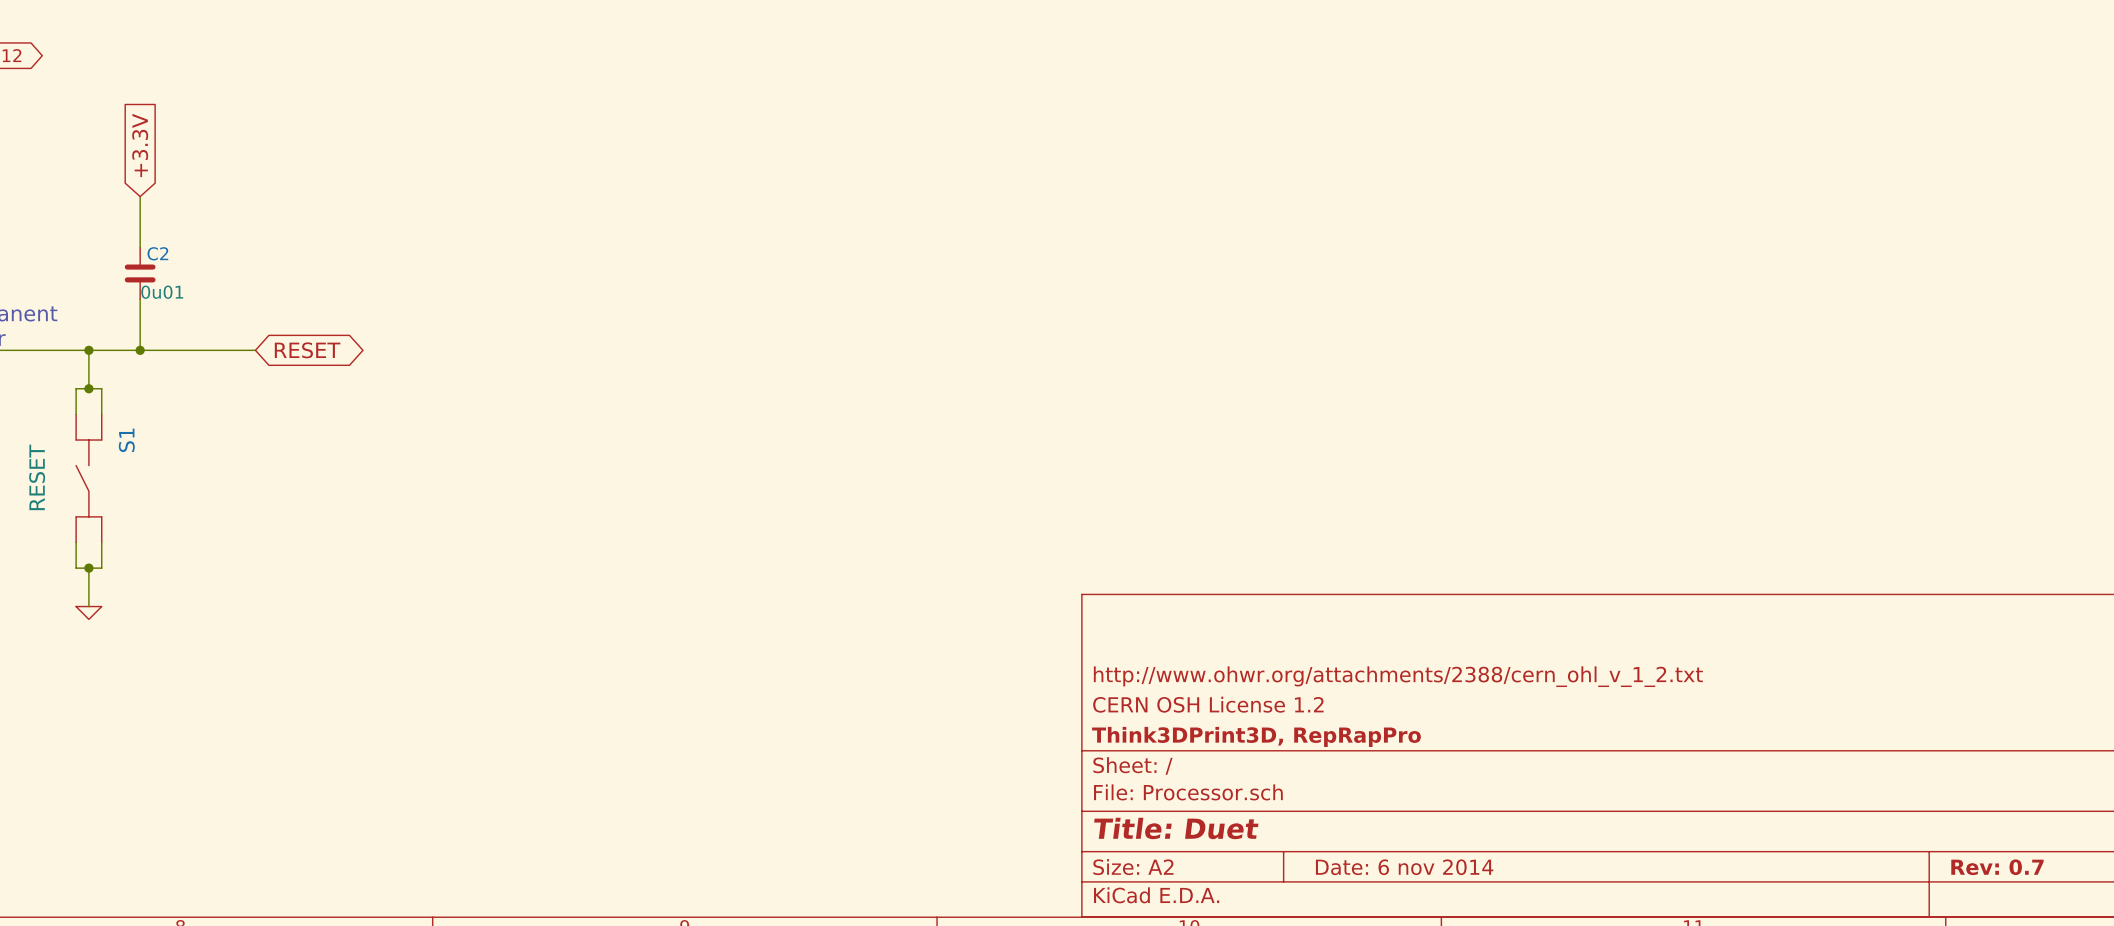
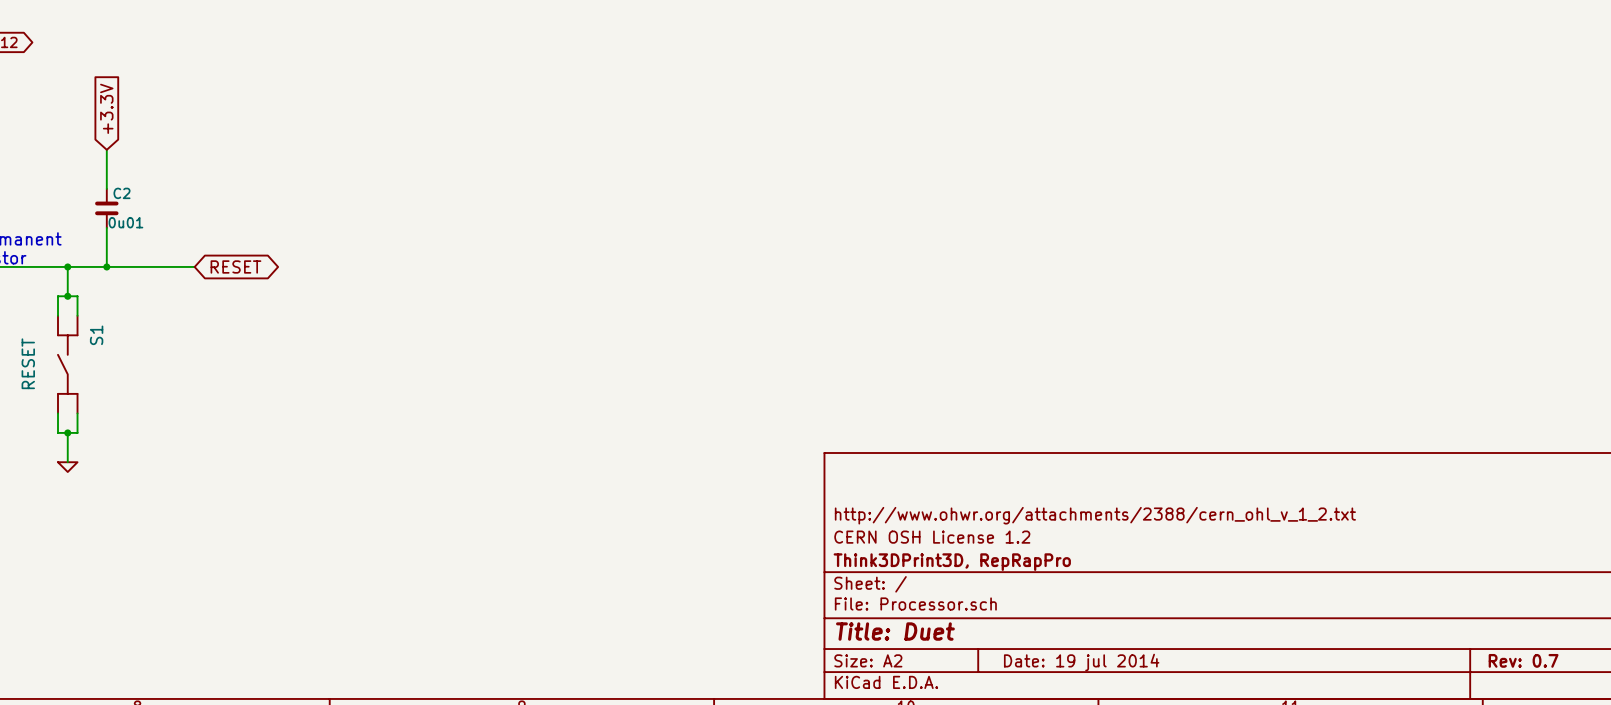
title block: Date: 6 nov 2014 (1404, 867) -> Date: 19 jul 2014 (1081, 662)

